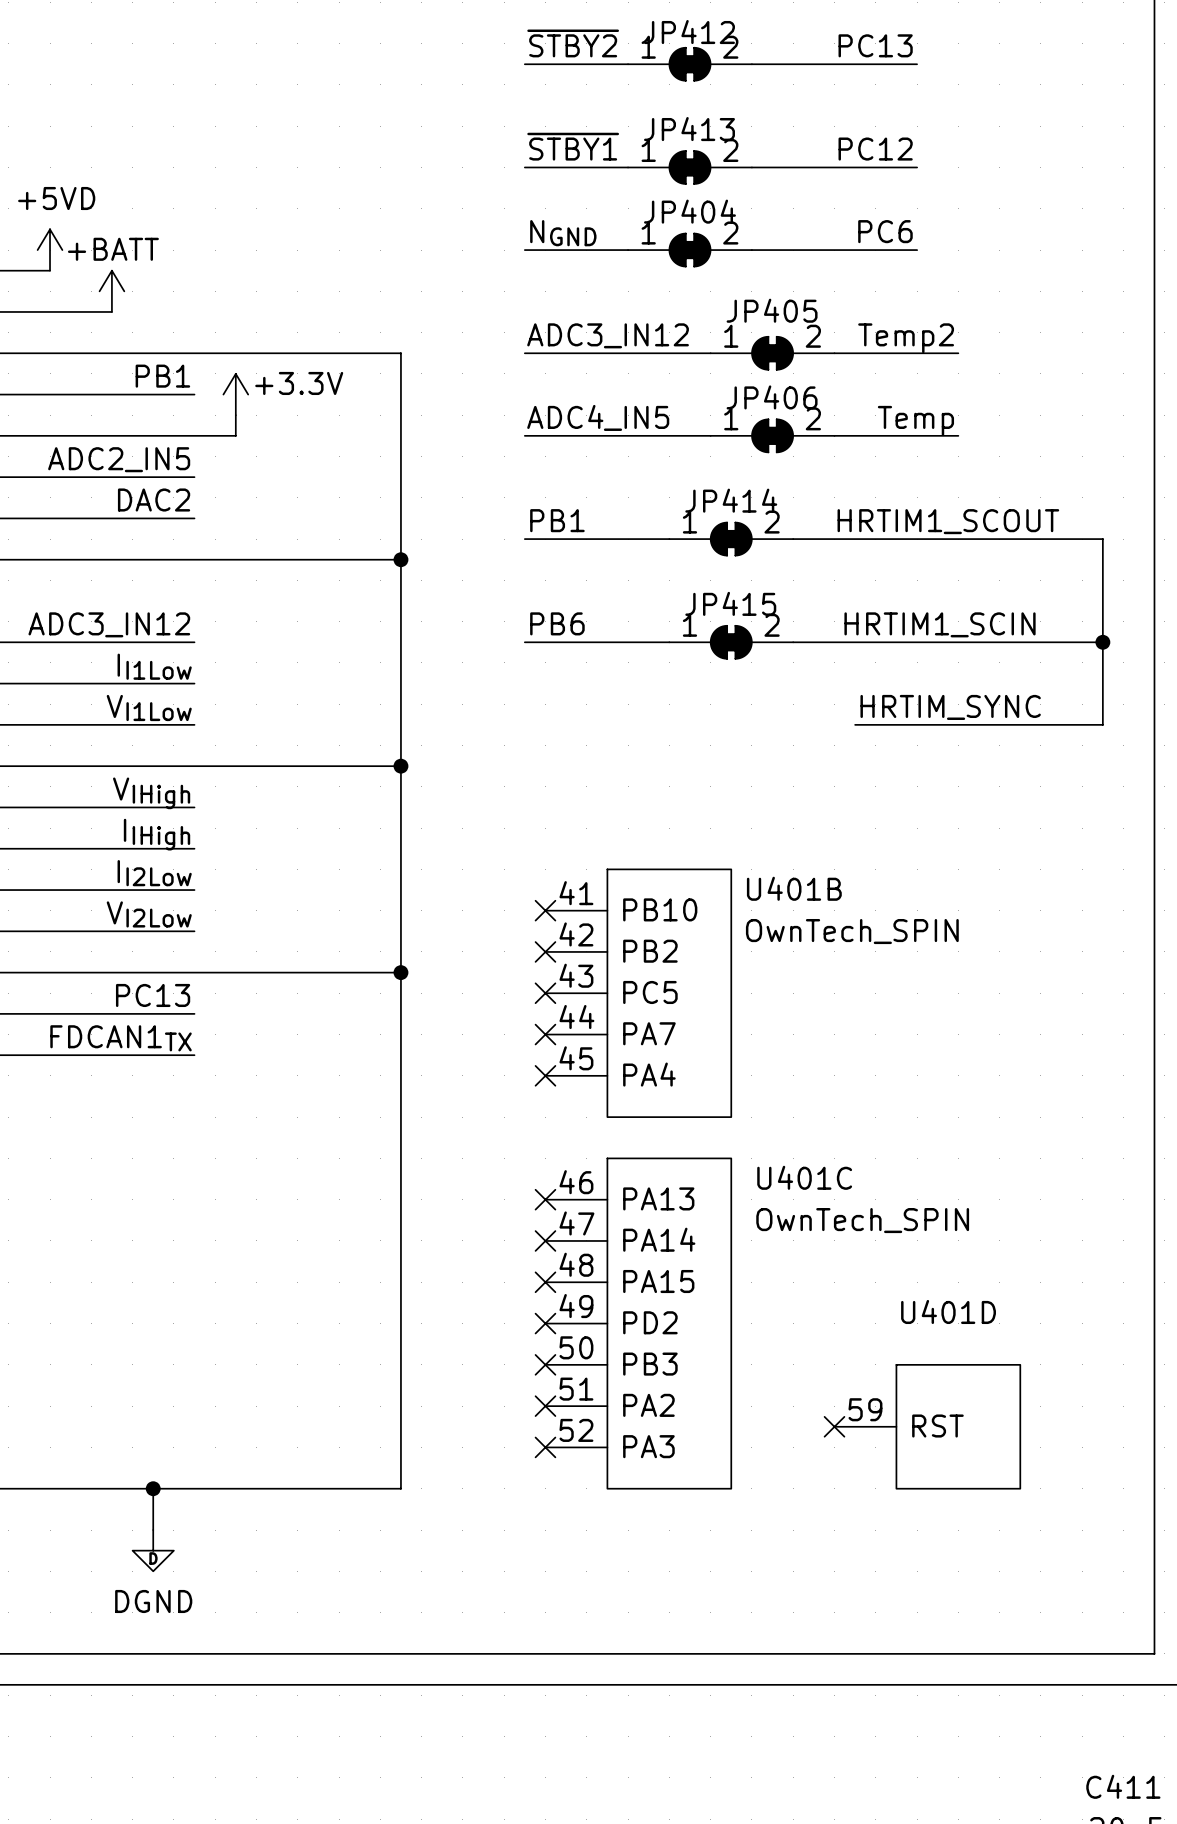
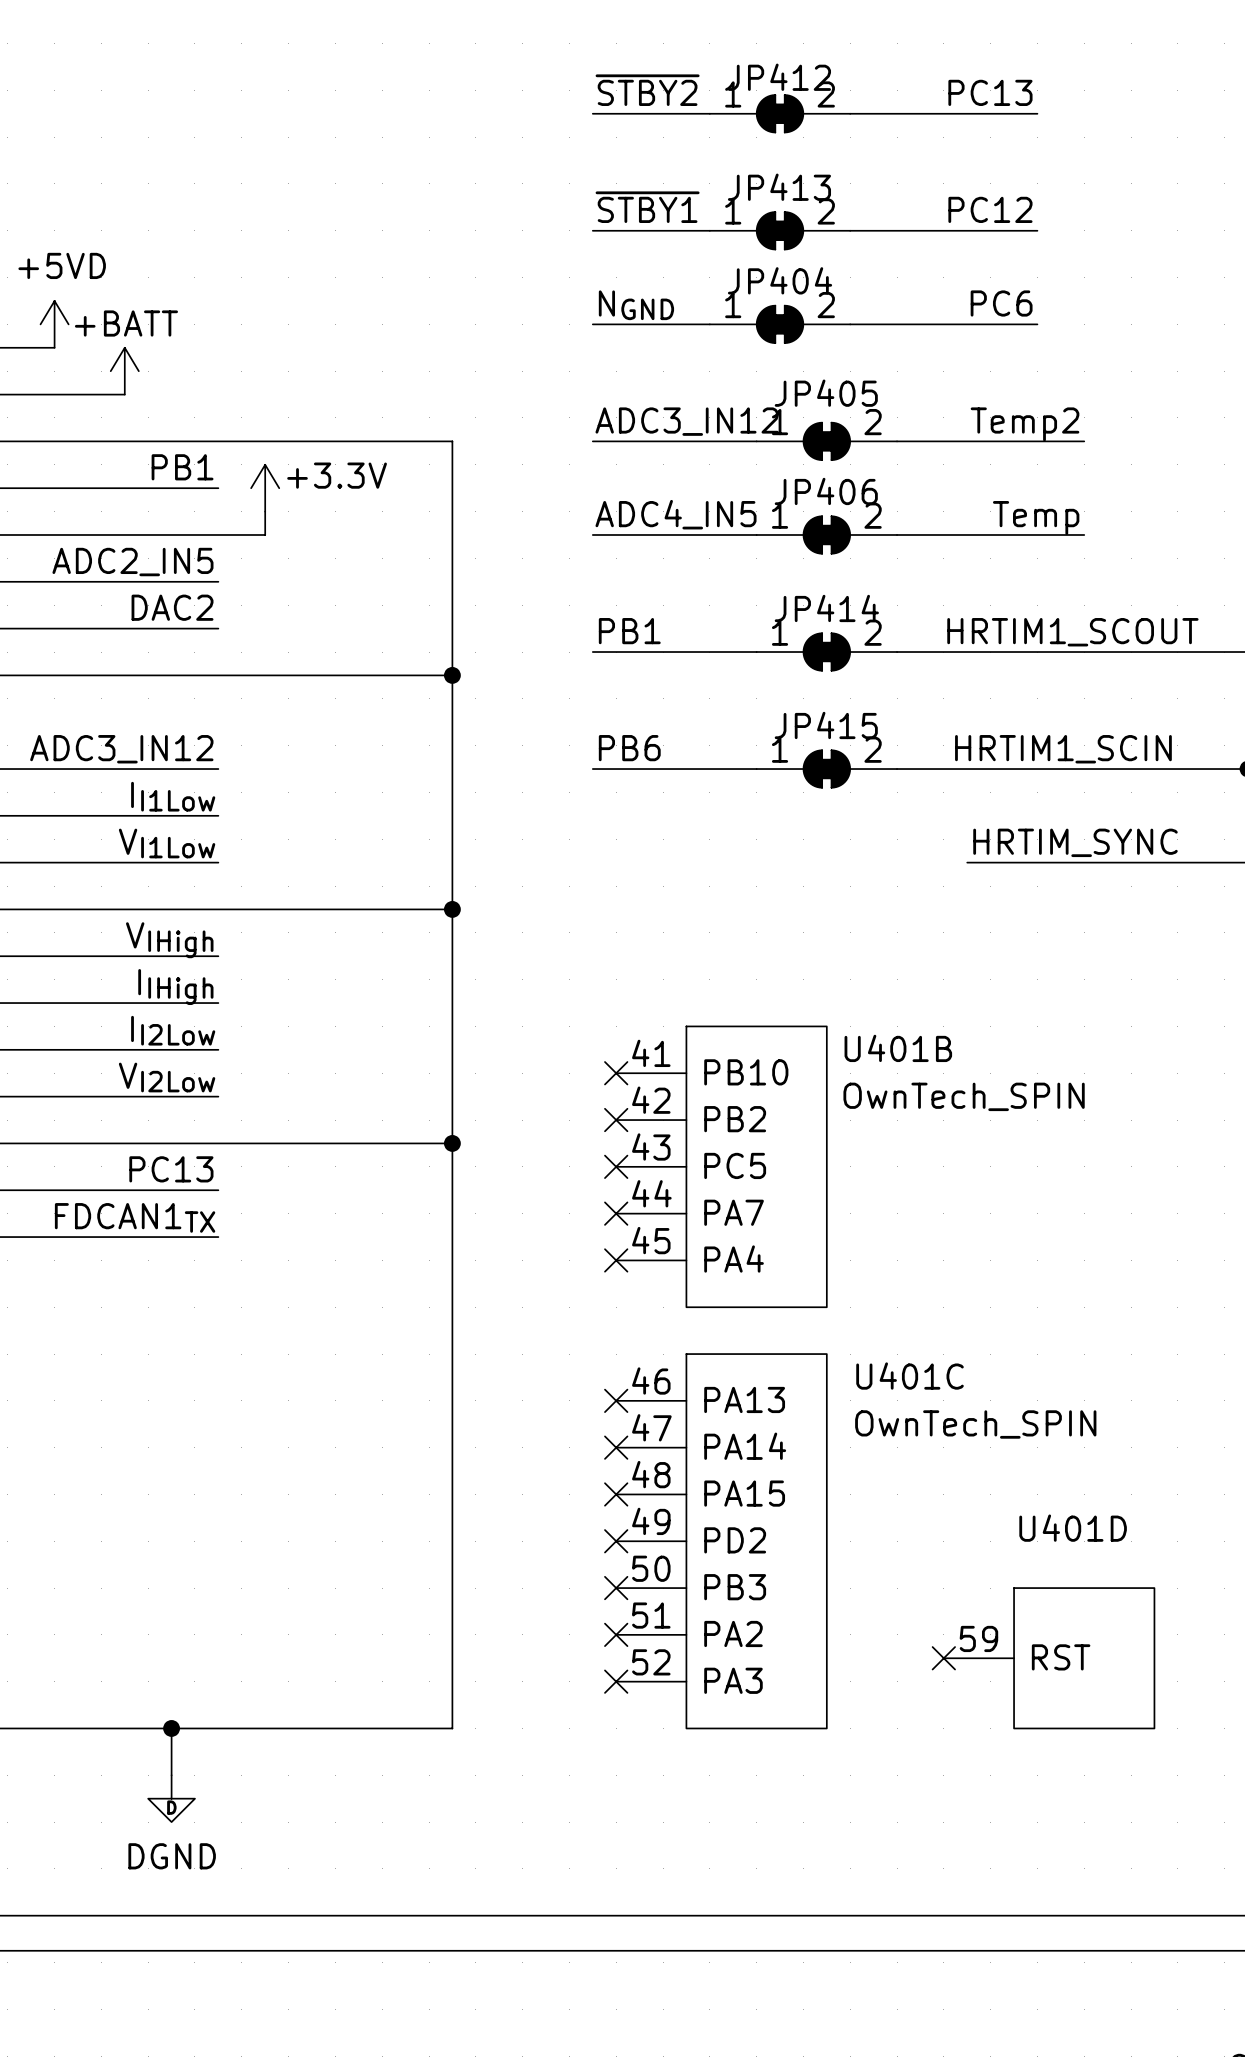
JP405 position: (772, 353) -> (826, 441)
JP406 position: (772, 435) -> (826, 534)

